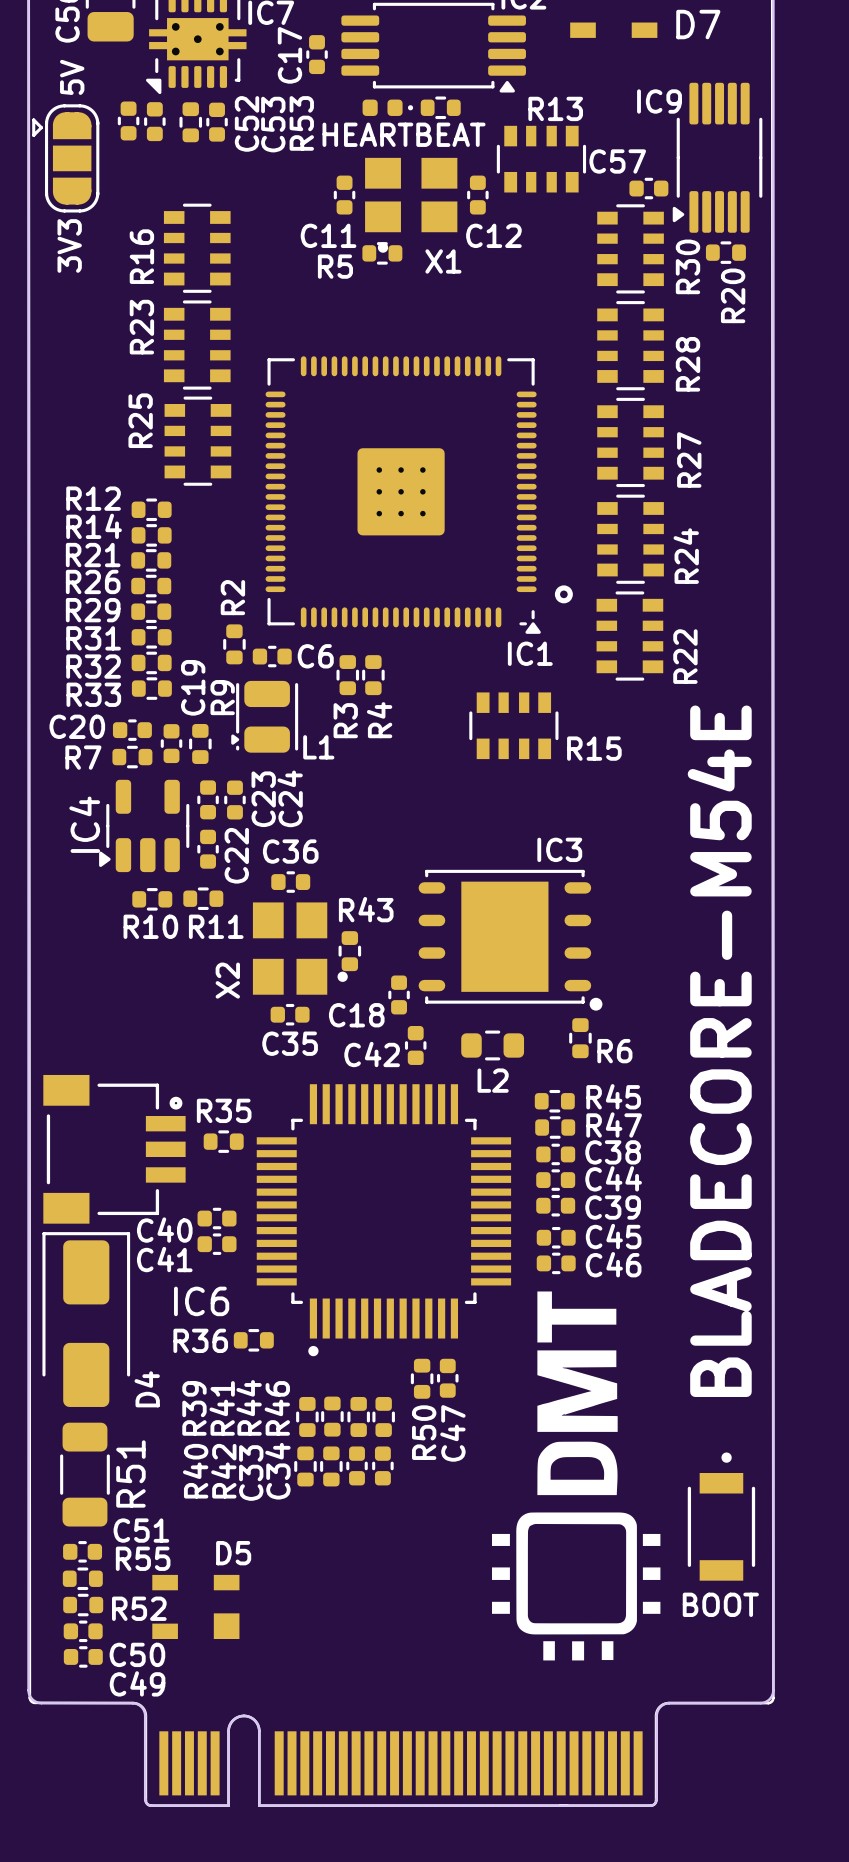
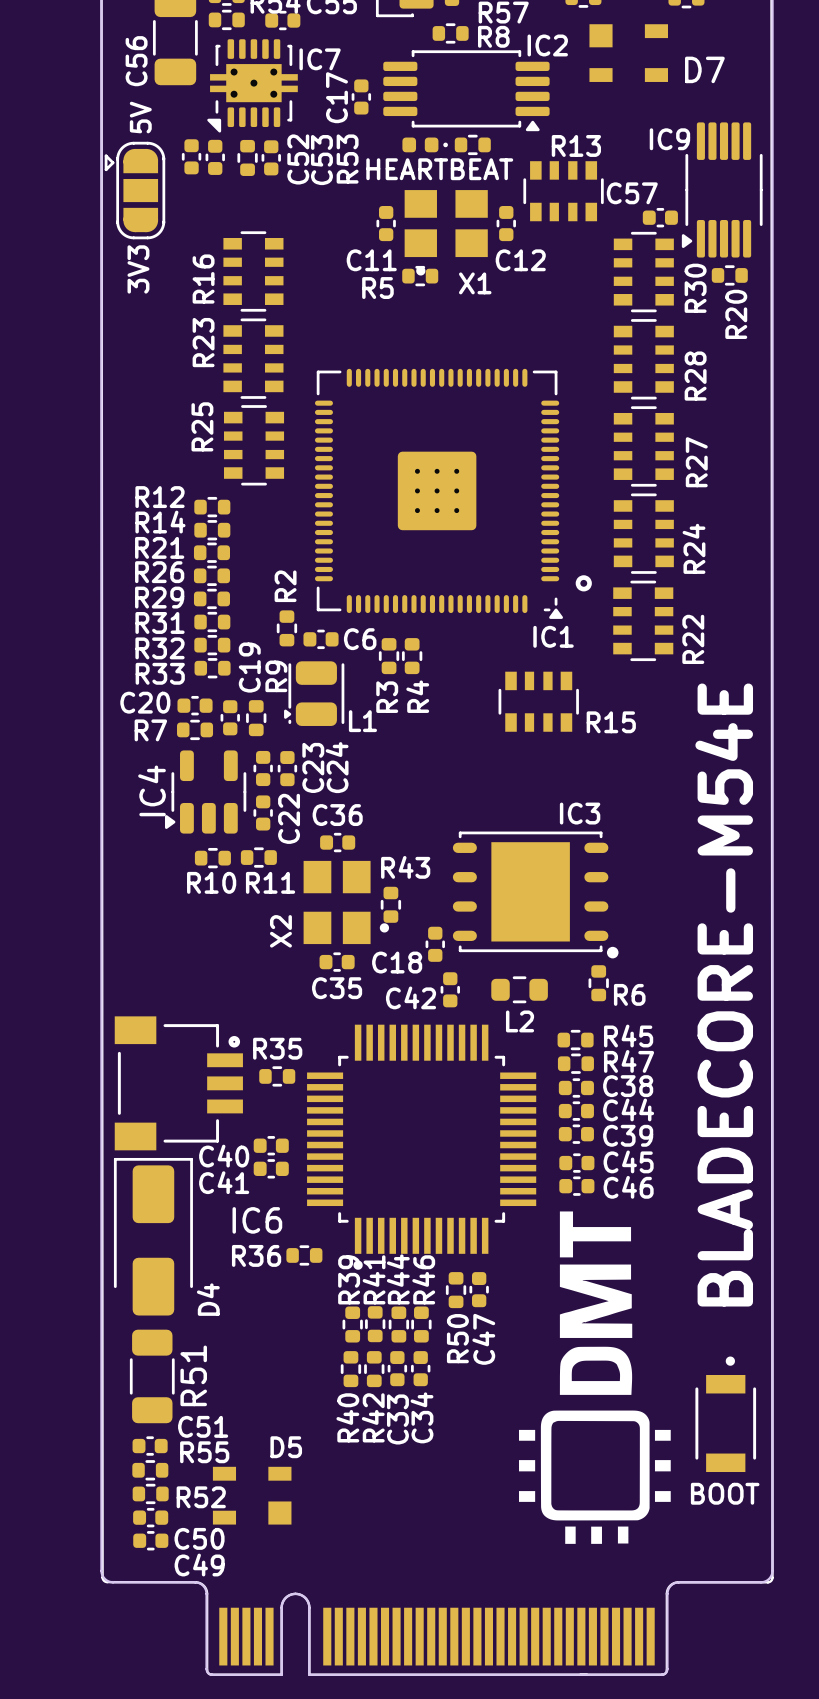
R44 name position: R44 (249, 1407) -> R44 (398, 1279)
R39 name position: R39 (194, 1408) -> R39 (349, 1279)
R41 name position: R41 (222, 1408) -> R41 (374, 1279)
R46 name position: R46 (277, 1408) -> R46 (423, 1279)
R40 name position: R40 (195, 1471) -> R40 (347, 1417)
R42 name position: R42 (223, 1471) -> R42 (373, 1417)
C34 name position: C34 (277, 1471) -> C34 (422, 1417)
C33 name position: C33 (251, 1472) -> C33 (397, 1419)

